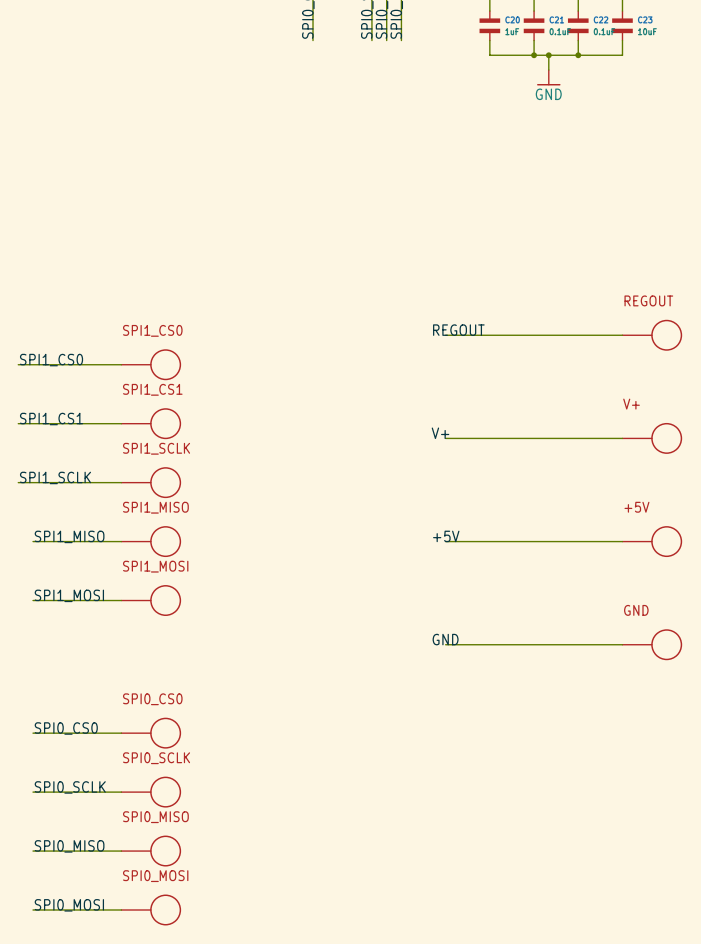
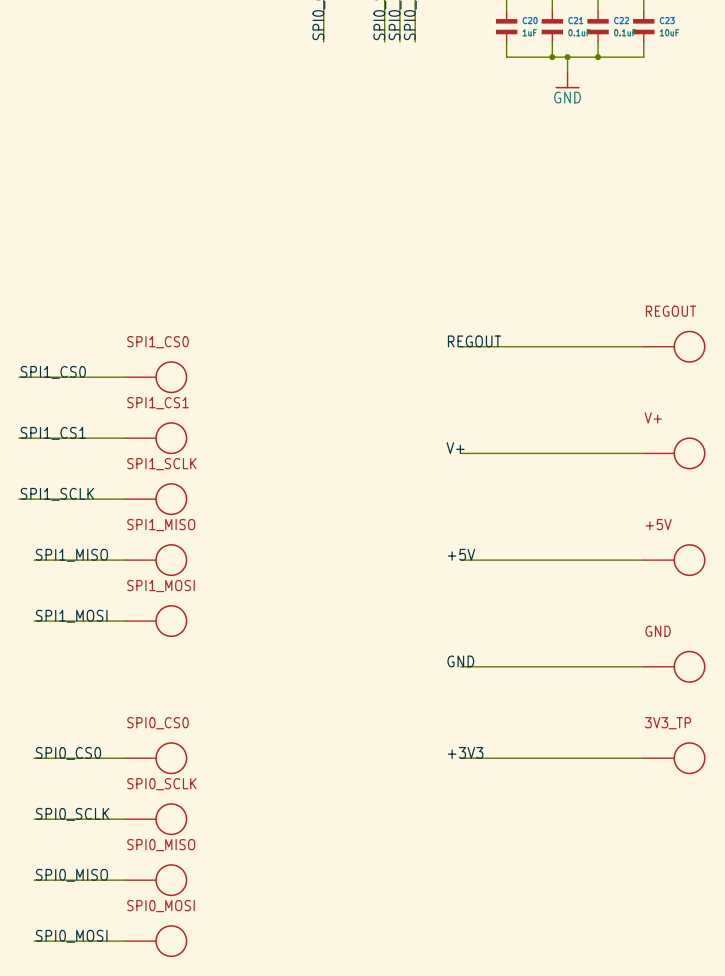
label: none -> +3V3 (465, 752)
wire: none -> (460, 758) (643, 758)
3V3_TP: none -> (674, 758)

